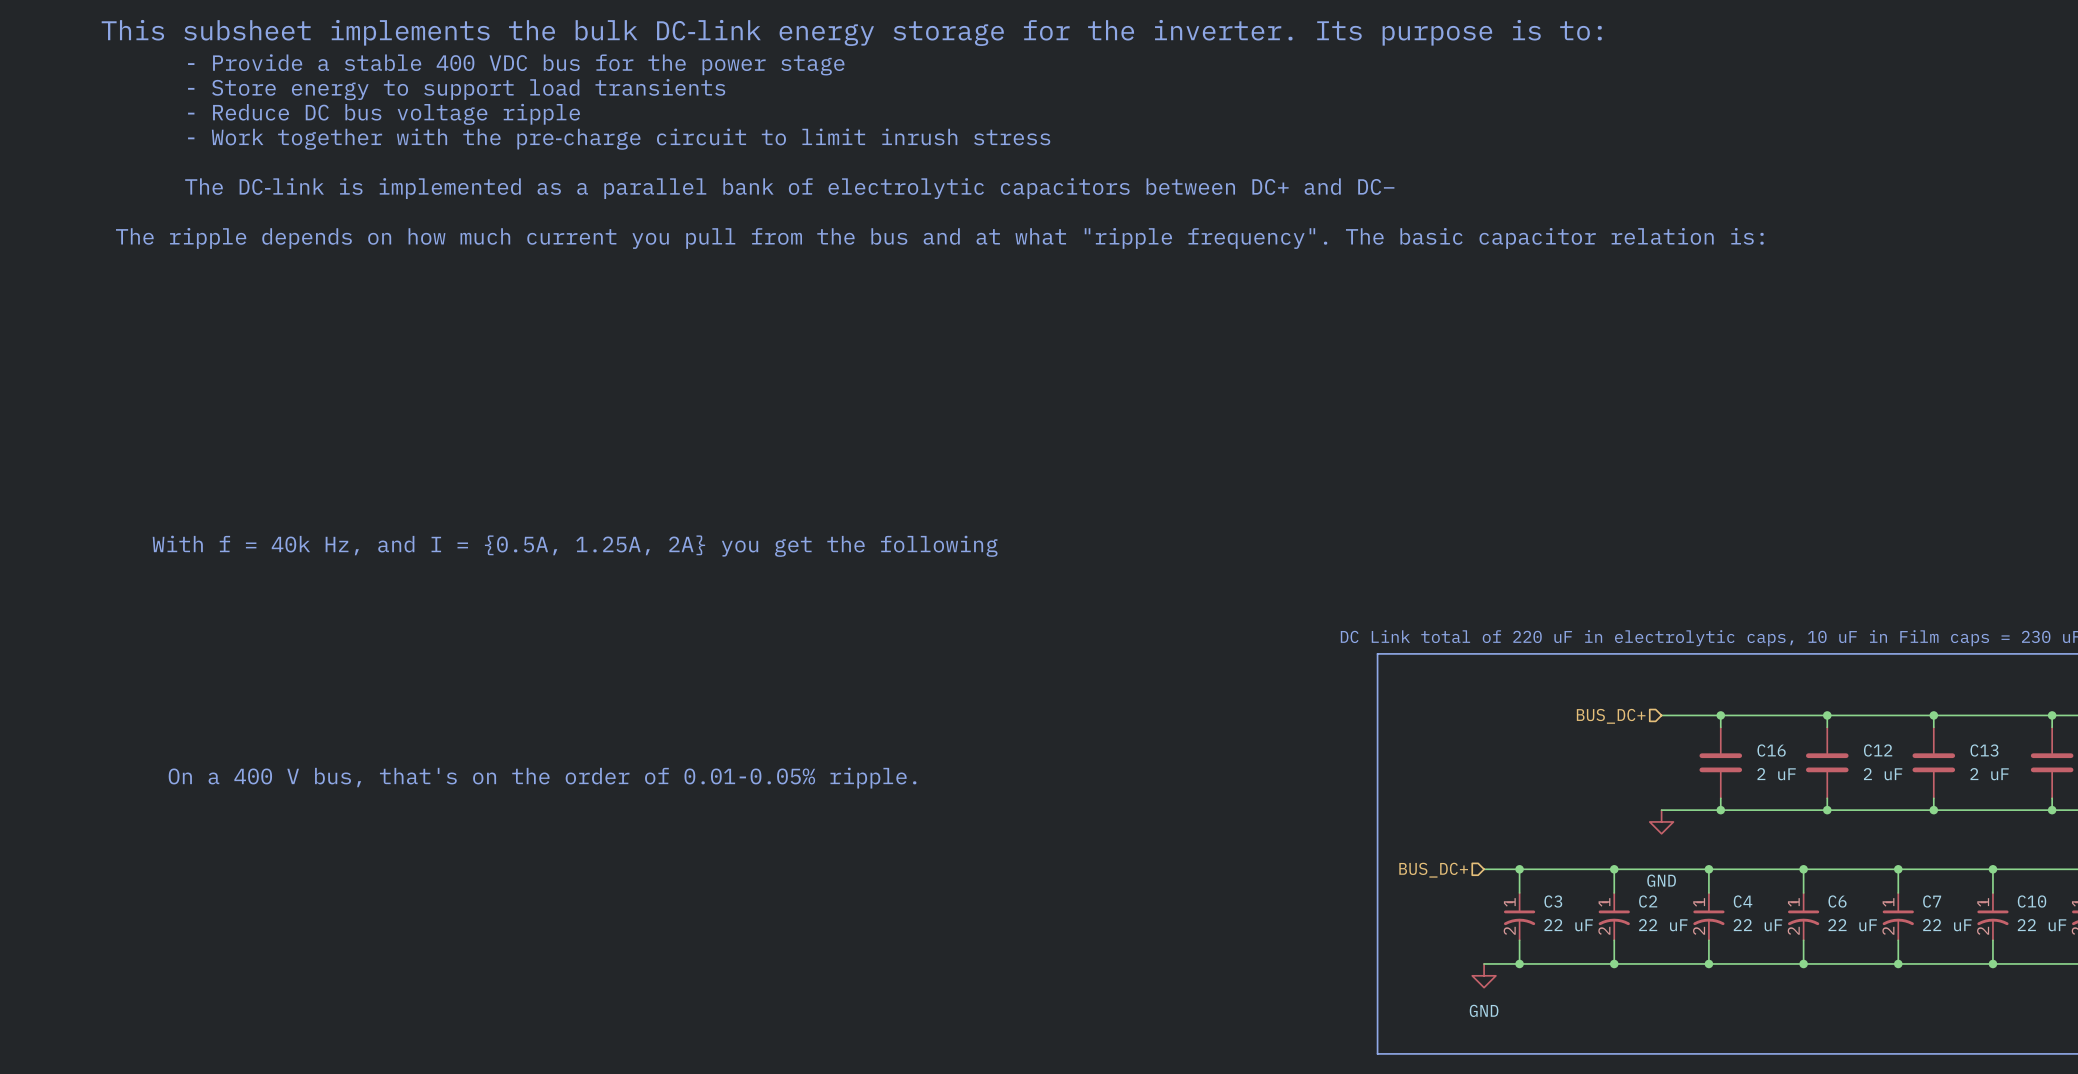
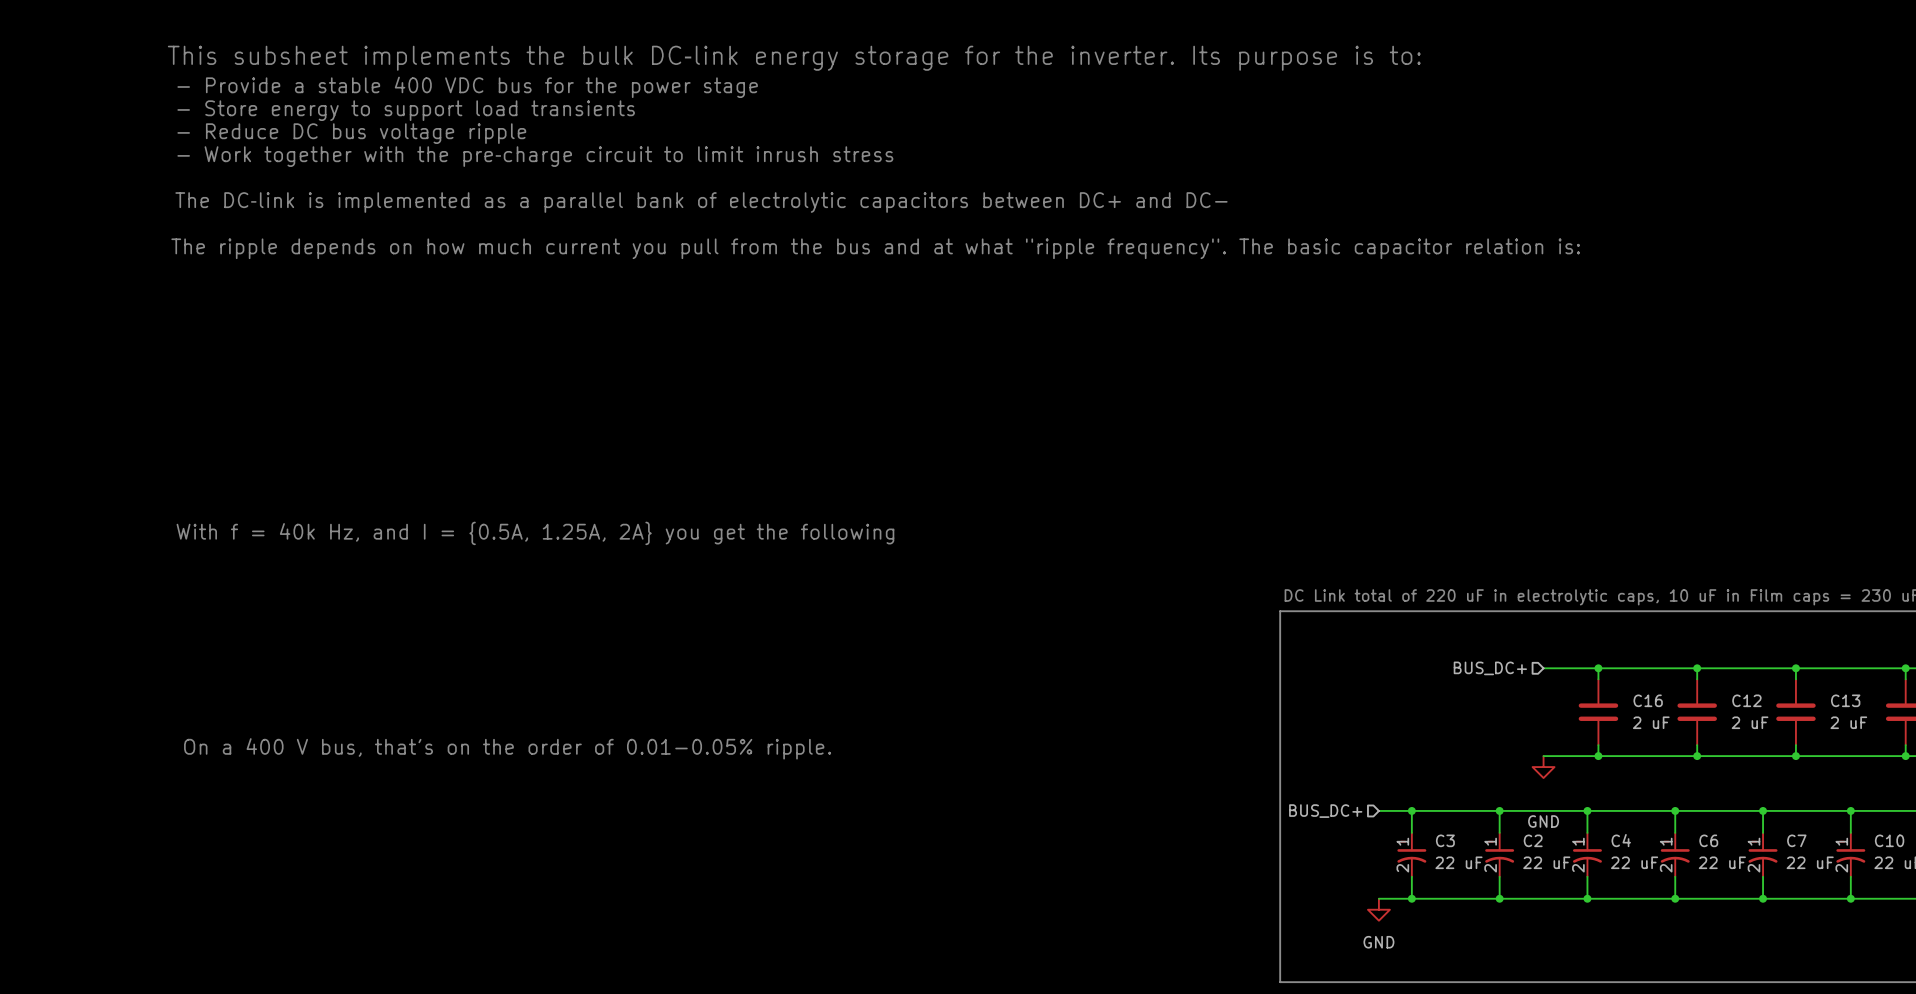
text position: This subsheet implements the bulk DC‑link energy storage for the inverter. Its purpose is to: (851, 32) -> This subsheet implements the bulk DC‑link energy storage for the inverter. Its purpose is to: (794, 58)
text position: - Provide a stable 400 VDC bus for the power stage (516, 64) -> - Provide a stable 400 VDC bus for the power stage (467, 87)
text position: - Store energy to support load transients (456, 89) -> - Store energy to support load transients (406, 110)
text position: - Reduce DC bus voltage ripple (383, 114) -> - Reduce DC bus voltage ripple (351, 133)
text position: - Work together with the pre‑charge circuit to limit inrush stress (619, 139) -> - Work together with the pre‑charge circuit to limit inrush stress (535, 156)
text position: The DC‑link is implemented as a parallel bank of electrolytic capacitors between DC+ and DC− (789, 188) -> The DC‑link is implemented as a parallel bank of electrolytic capacitors between DC+ and DC− (701, 202)
text position: The ripple depends on how much current you pull from the bus and at what "ripple frequency". The basic capacitor relation is: (939, 238) -> The ripple depends on how much current you pull from the bus and at what "ripple frequency". The basic capacitor relation is: (875, 248)
text position: With f = 40k Hz, and I = {0.5A, 1.25A, 2A} you get the following (575, 546) -> With f = 40k Hz, and I = {0.5A, 1.25A, 2A} you get the following (535, 533)
text position: On a 400 V bus, that's on the order of 0.01-0.05% ripple. (542, 778) -> On a 400 V bus, that's on the order of 0.01-0.05% ripple. (507, 748)

